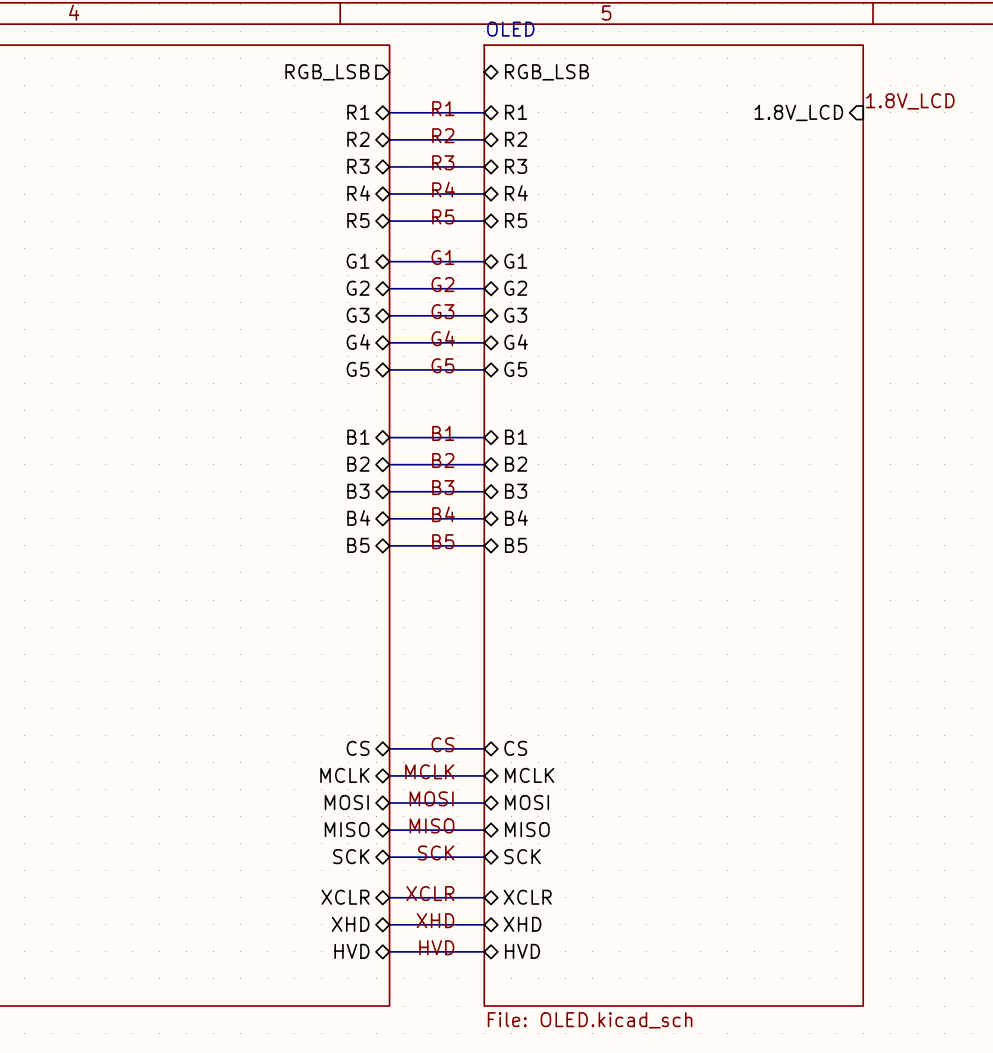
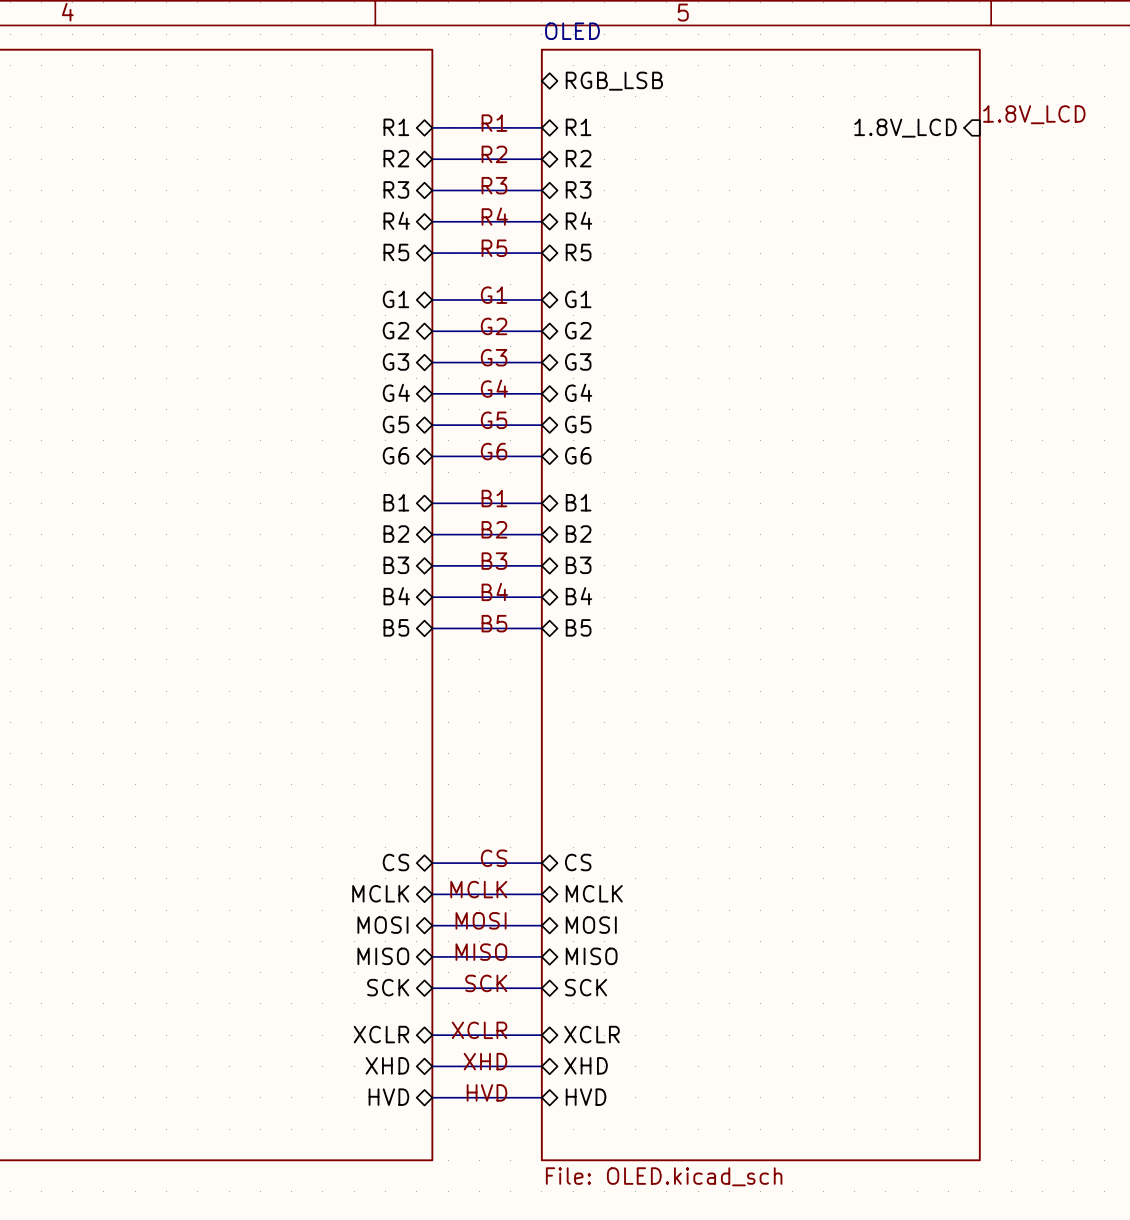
sheet pin: RGB_LSB (327, 72) -> none
label: none -> G6 (494, 451)
sheet pin: none -> G6 (395, 455)
sheet pin: none -> G6 (578, 455)
wire: none -> (432, 456) (541, 456)

